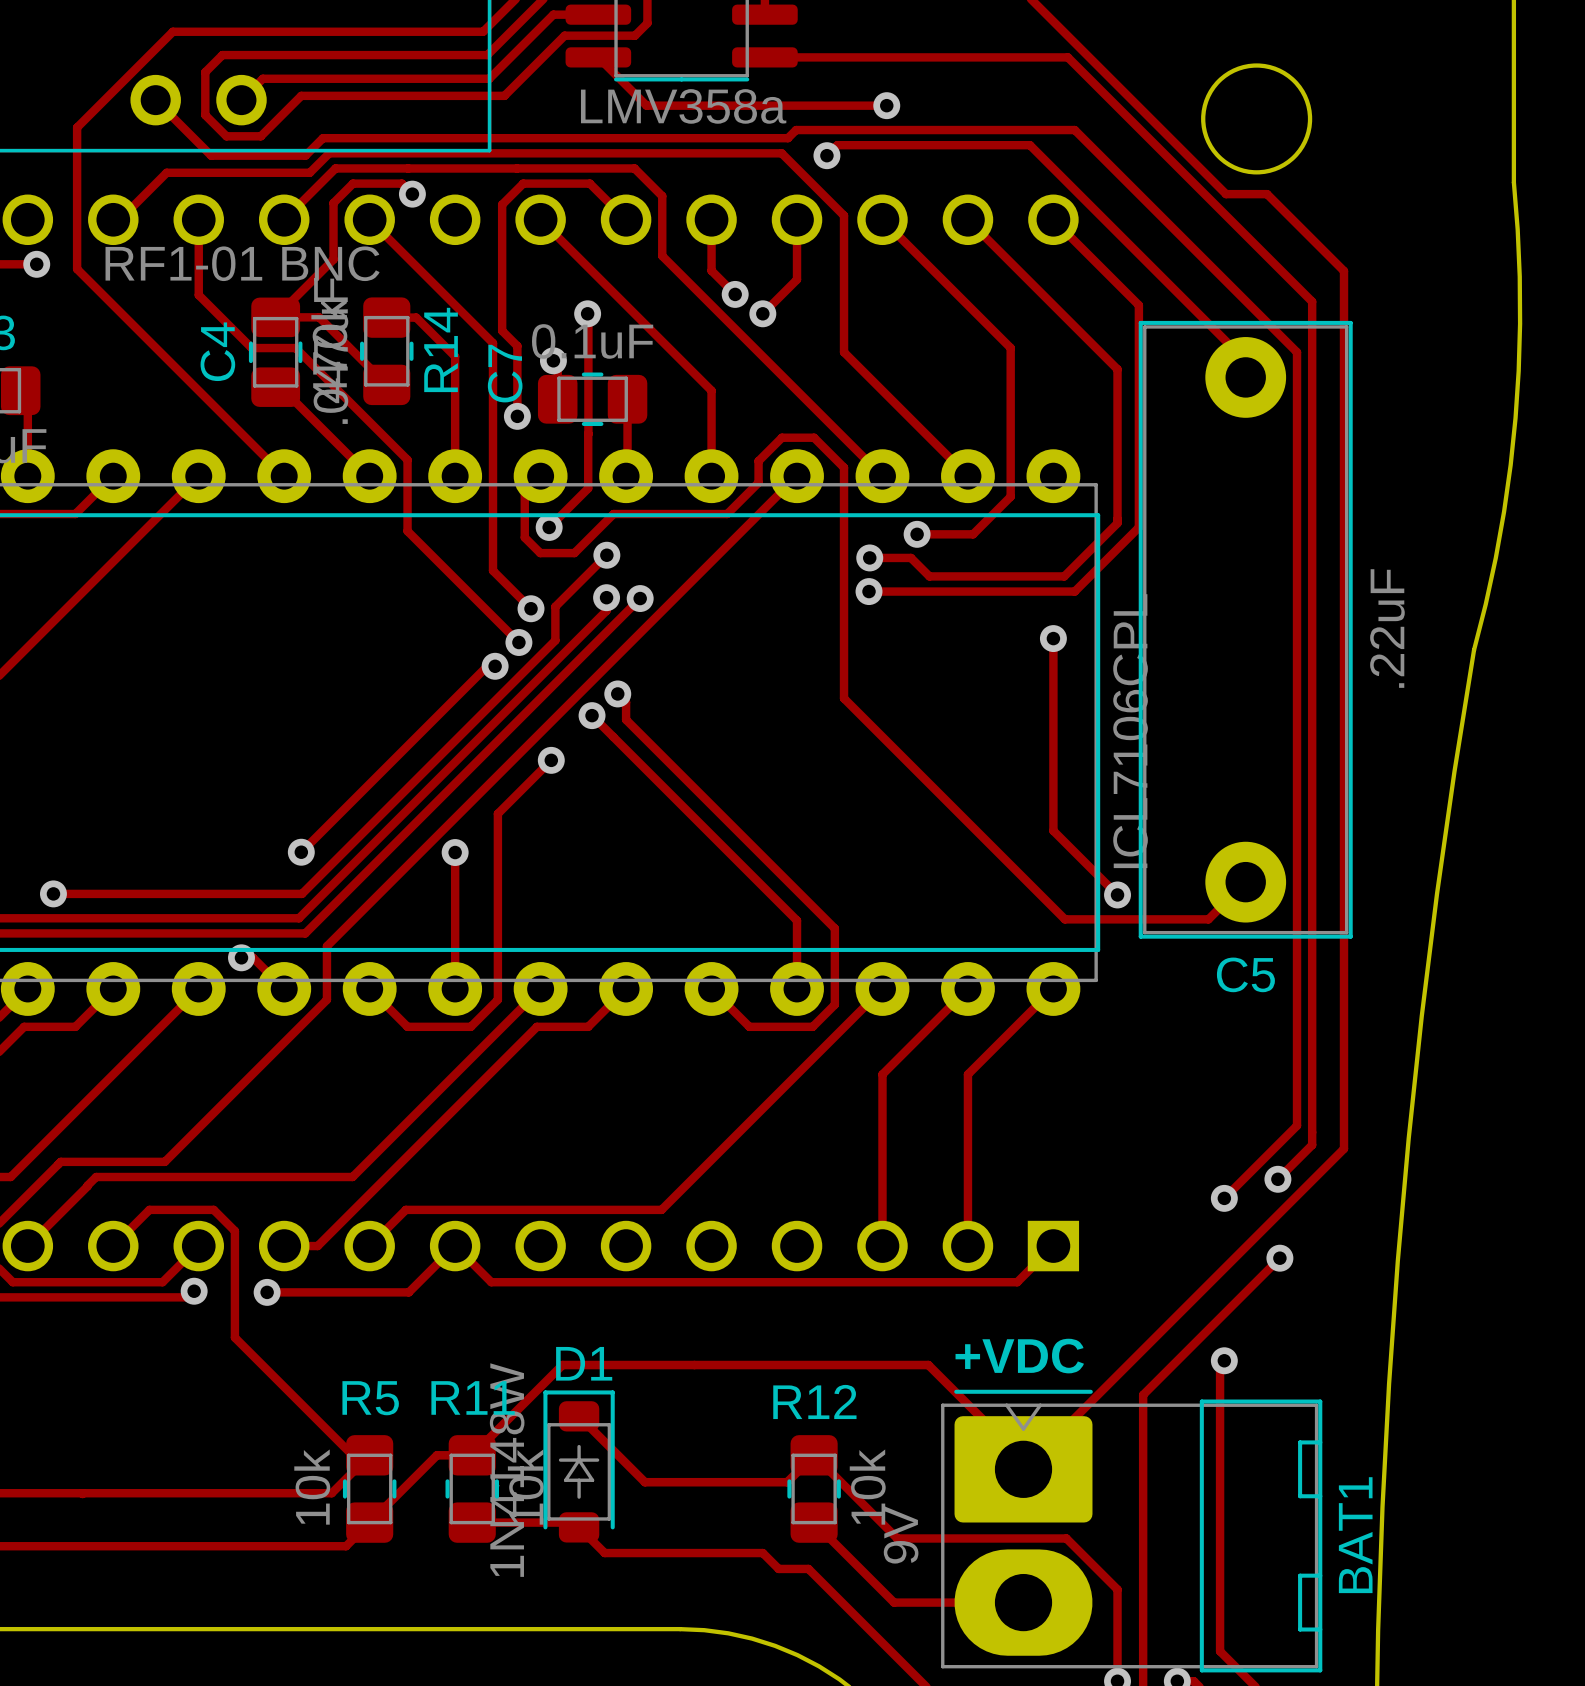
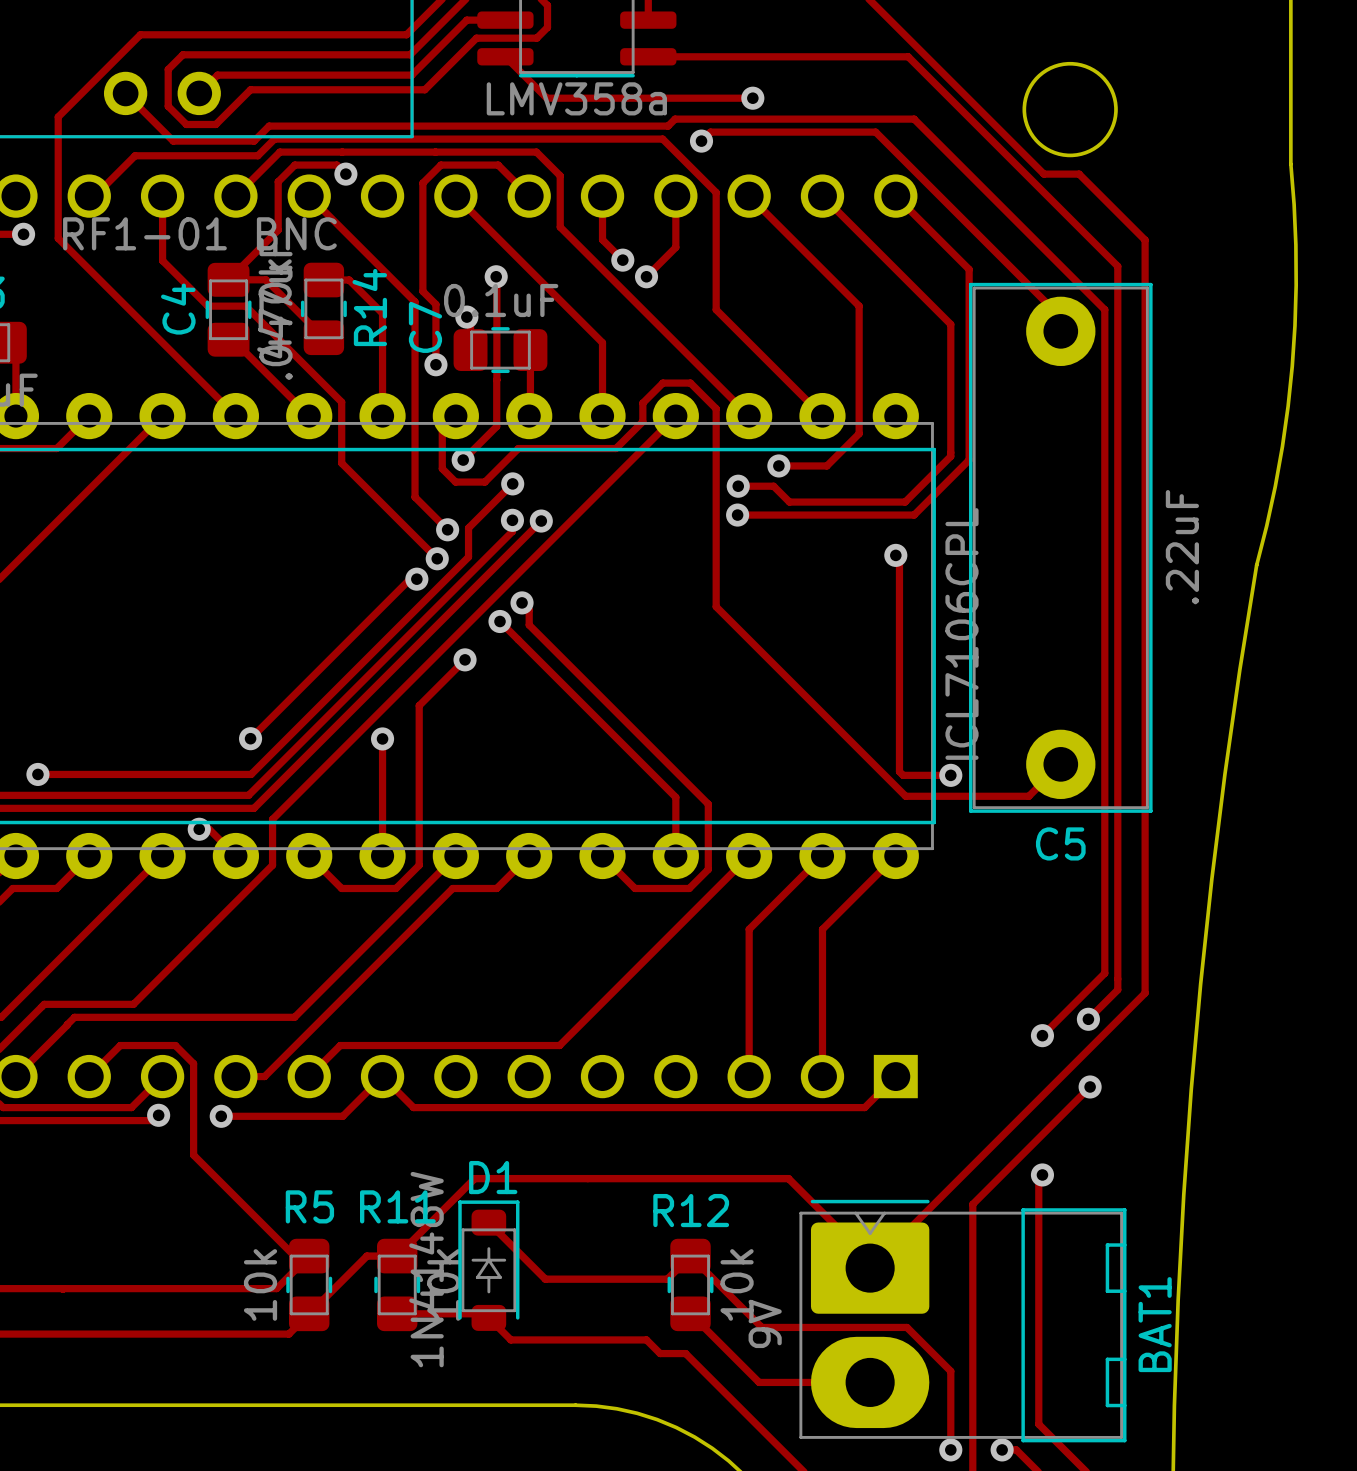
track: (1053, 638) (1053, 830) (1117, 894) -> (895, 555) (899, 559) (899, 771) (903, 775) (950, 775)
text: +VDC (1019, 1356) -> none

